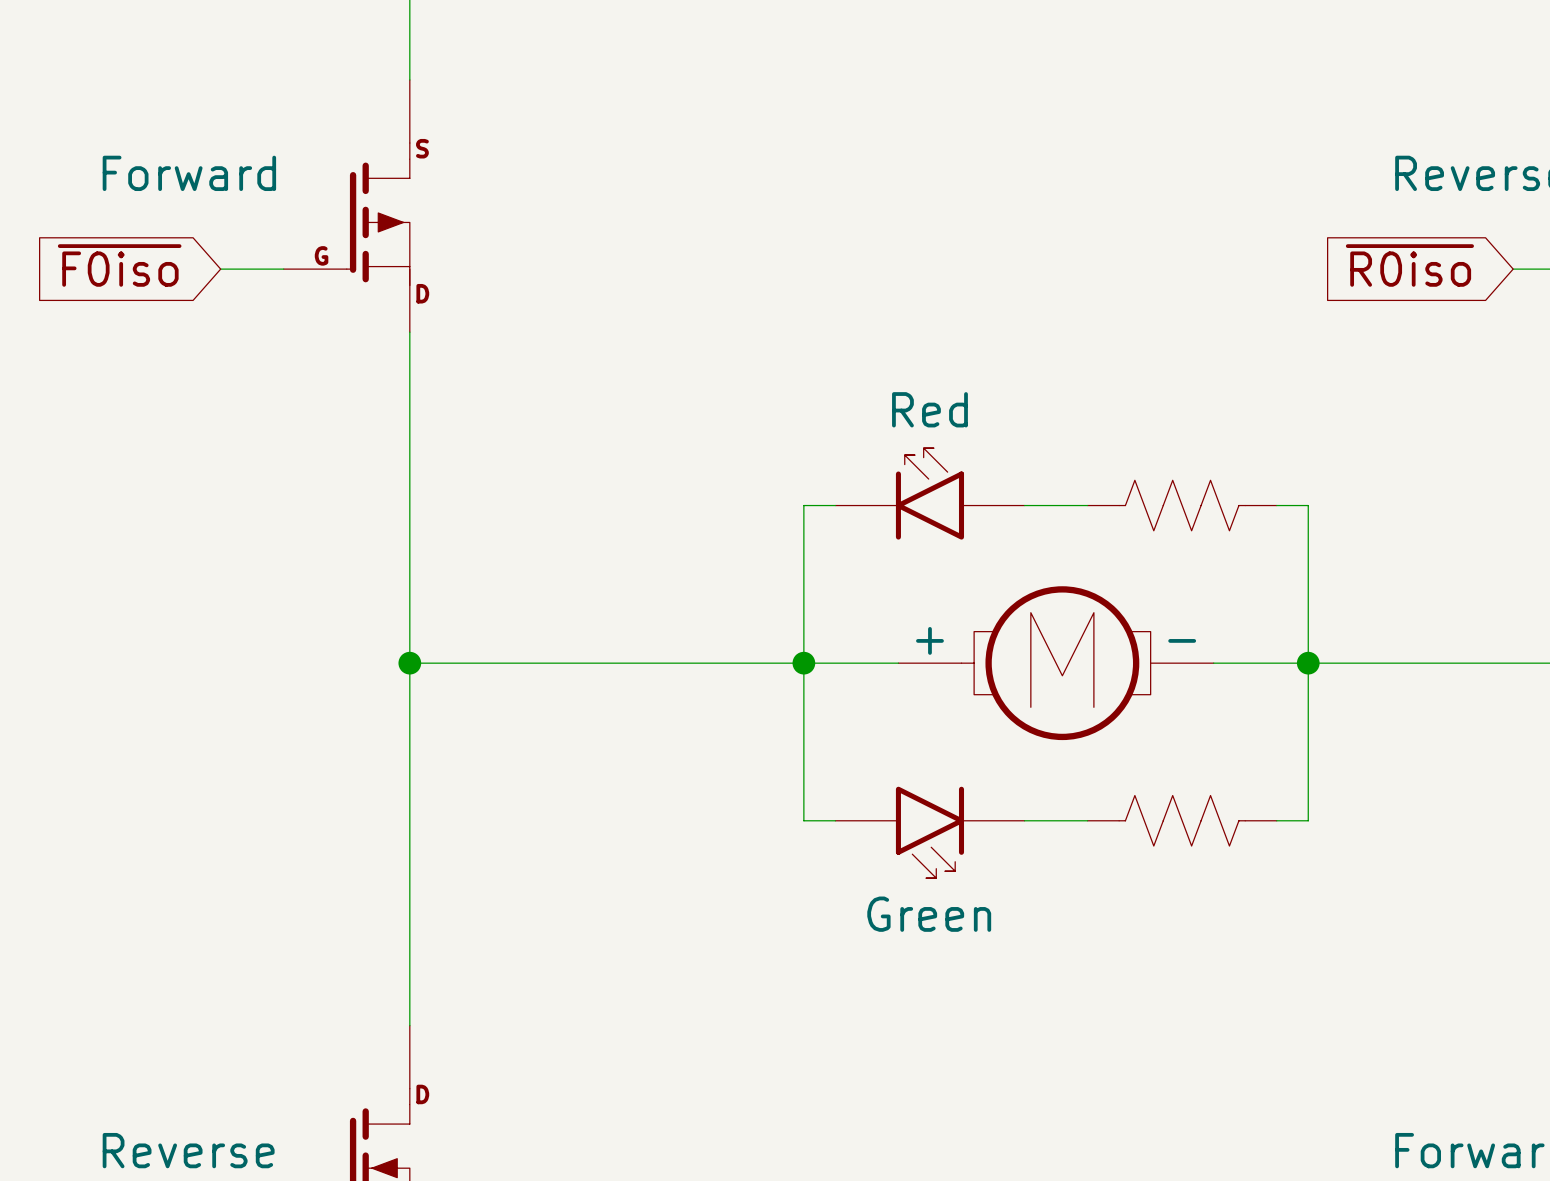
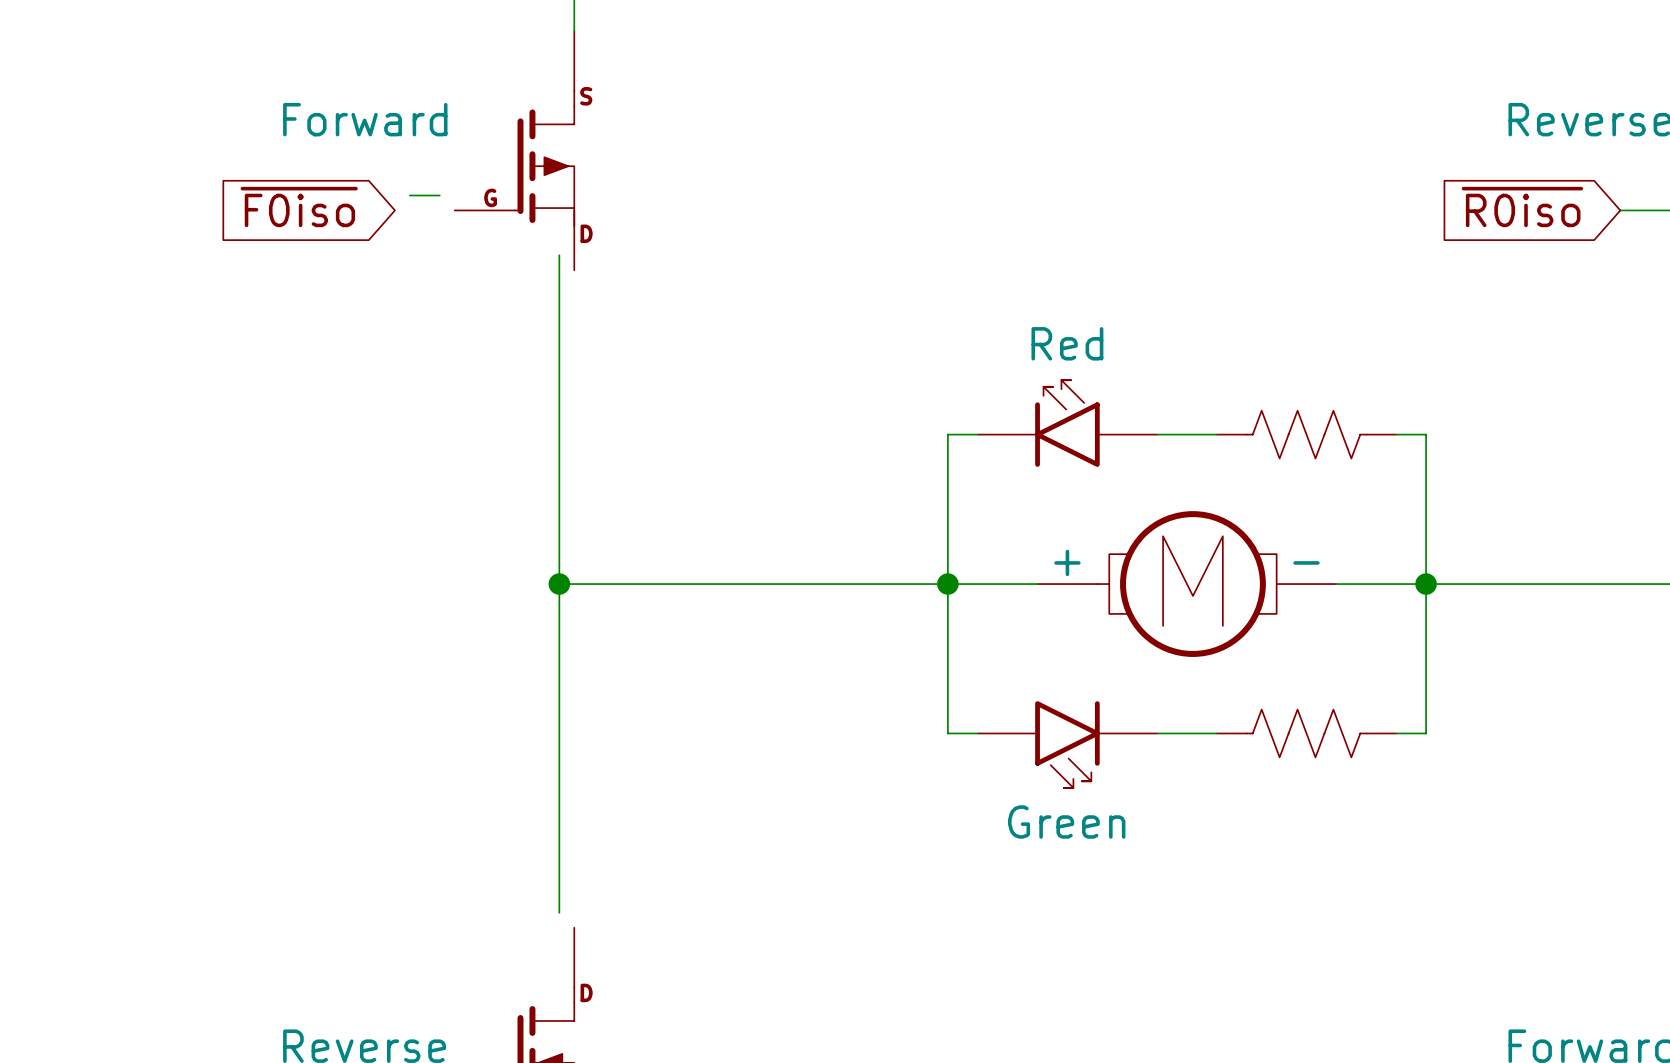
wire: none -> (409, 195) (439, 195)
wire: (220, 269) (283, 269) -> none
wire: (409, 332) (409, 1025) -> (559, 255) (559, 912)
junction position: (409, 663) -> (559, 584)

